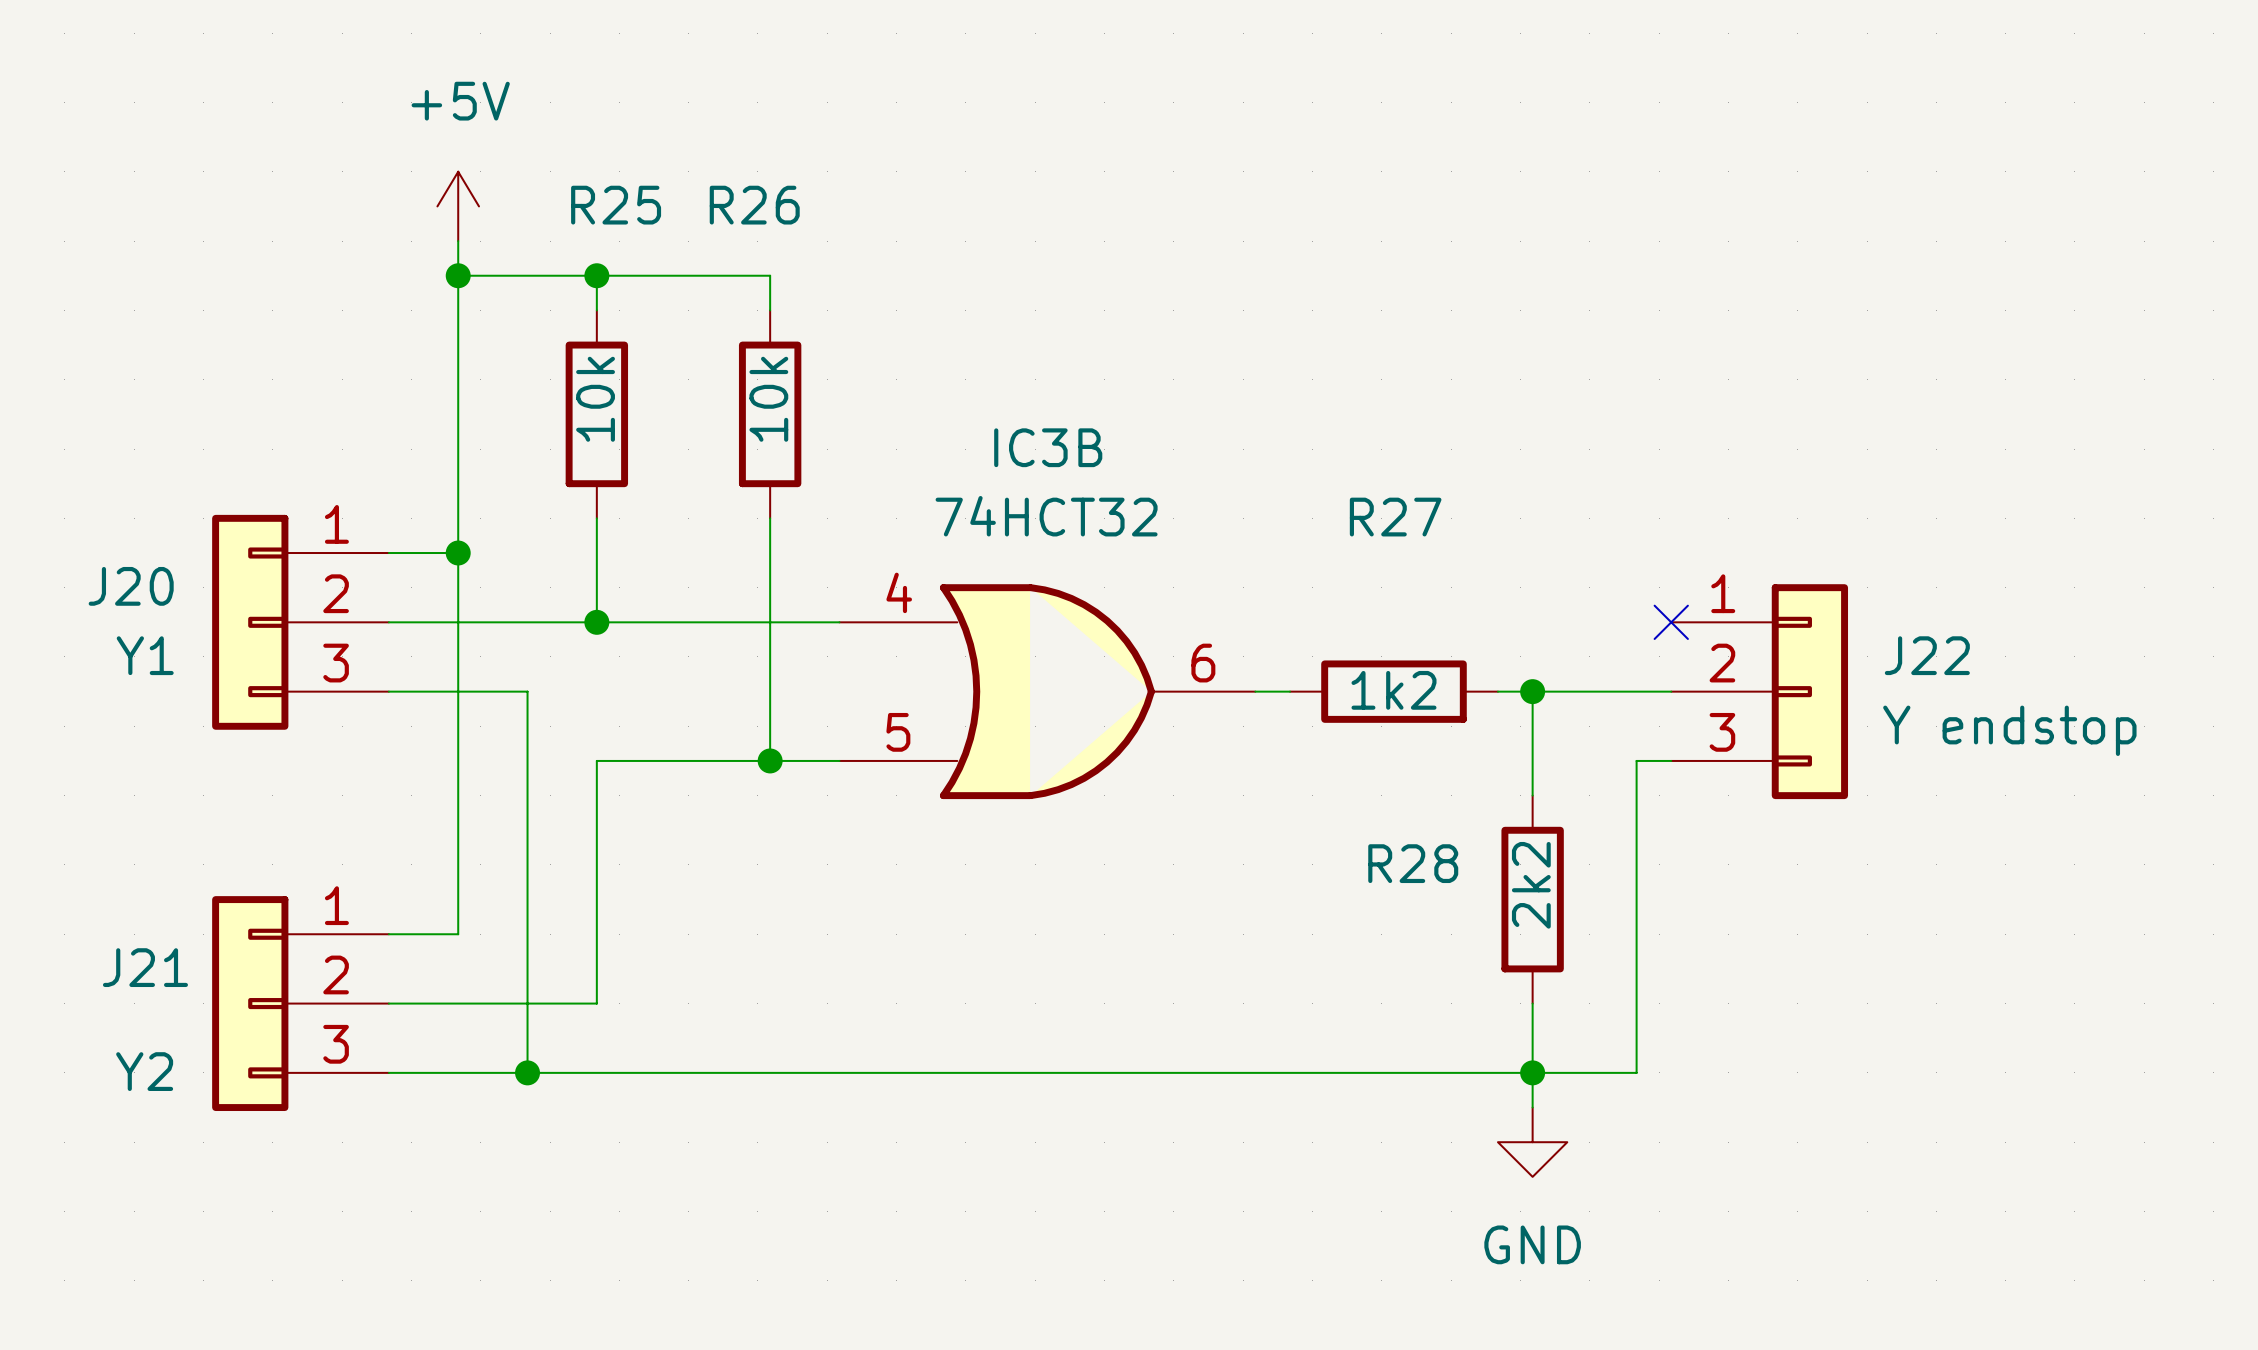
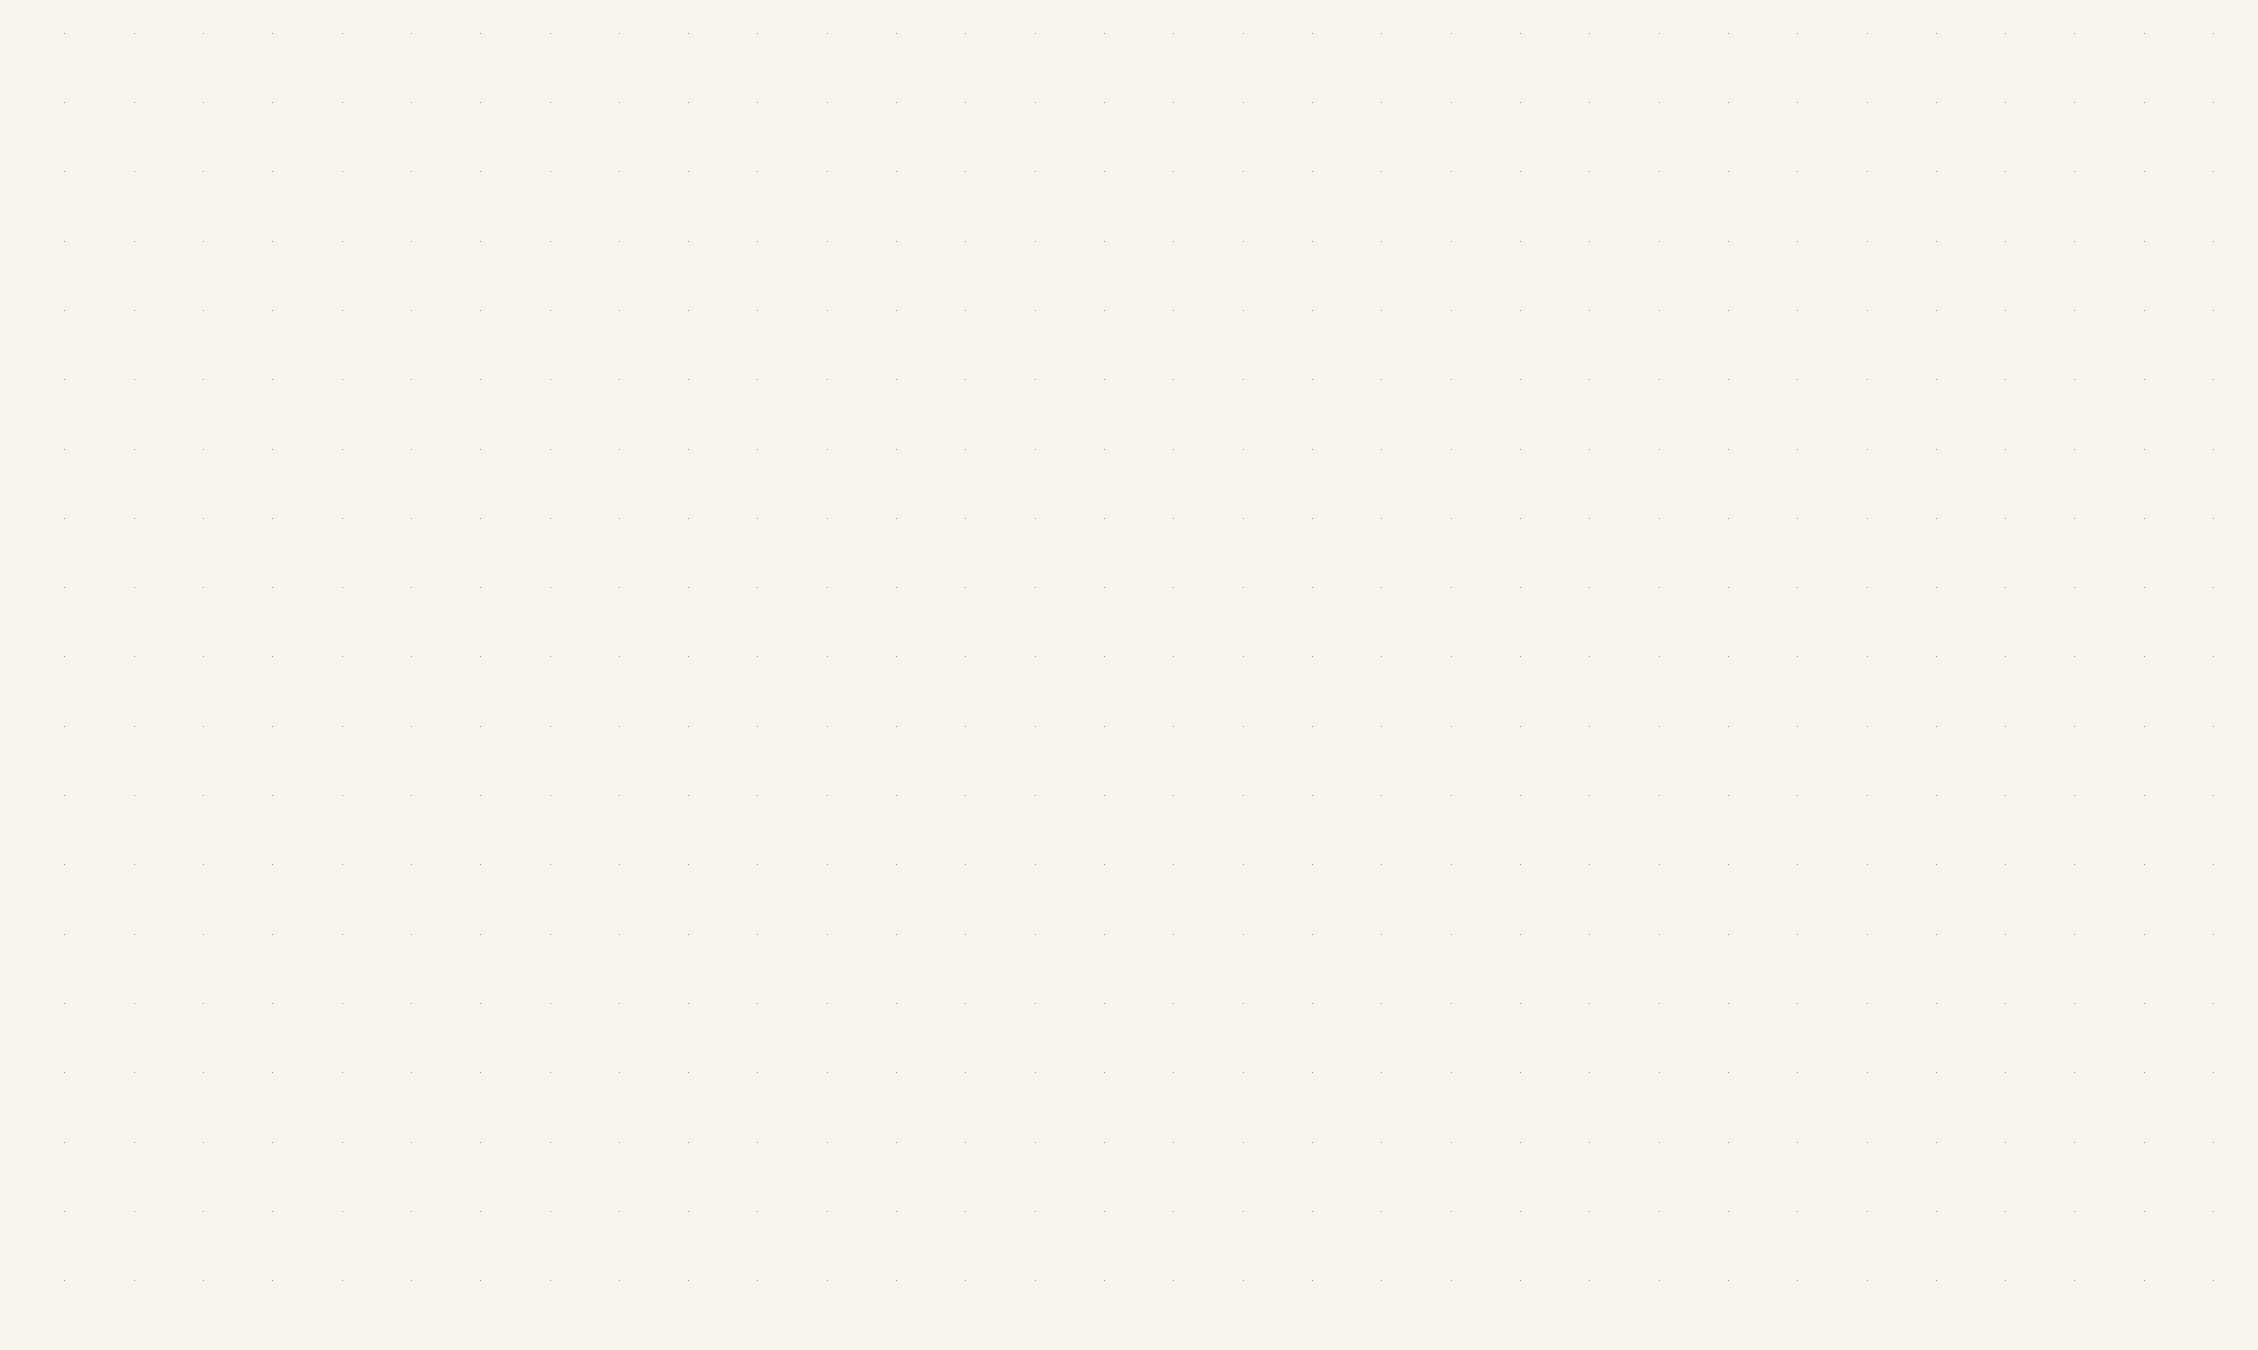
power symbol: +5V (458, 206) -> none
wire: (458, 241) (458, 934) (388, 934) -> none
wire: (458, 275) (770, 275) (770, 310) -> none
junction: (458, 275) -> none
wire: (596, 275) (596, 310) -> none
junction: (596, 275) -> none
R25: 10k (596, 414) -> none
R26: 10k (770, 414) -> none
wire: (596, 518) (596, 622) -> none
wire: (770, 518) (770, 760) -> none
wire: (388, 553) (458, 553) -> none
junction: (458, 553) -> none
J20: Y1 (300, 622) -> none
wire: (388, 622) (839, 622) -> none
junction: (596, 622) -> none
no-connect mark: (1671, 622) -> none
wire: (388, 691) (527, 691) (527, 1072) -> none
IC3B: 74HCT32 (1047, 691) -> none
wire: (1255, 691) (1290, 691) -> none
R27: 1k2 (1393, 691) -> none
wire: (1497, 691) (1671, 691) -> none
wire: (1532, 691) (1532, 795) -> none
junction: (1532, 691) -> none
J22: Y endstop (1759, 691) -> none
junction: (770, 760) -> none
wire: (839, 760) (596, 760) (596, 1003) (388, 1003) -> none
wire: (1671, 760) (1636, 760) (1636, 1072) (388, 1072) -> none
R28: 2k2 (1532, 899) -> none
J21: Y2 (300, 1003) -> none
wire: (1532, 1003) (1532, 1107) -> none
junction: (527, 1072) -> none
junction: (1532, 1072) -> none
power symbol: GND (1532, 1142) -> none

